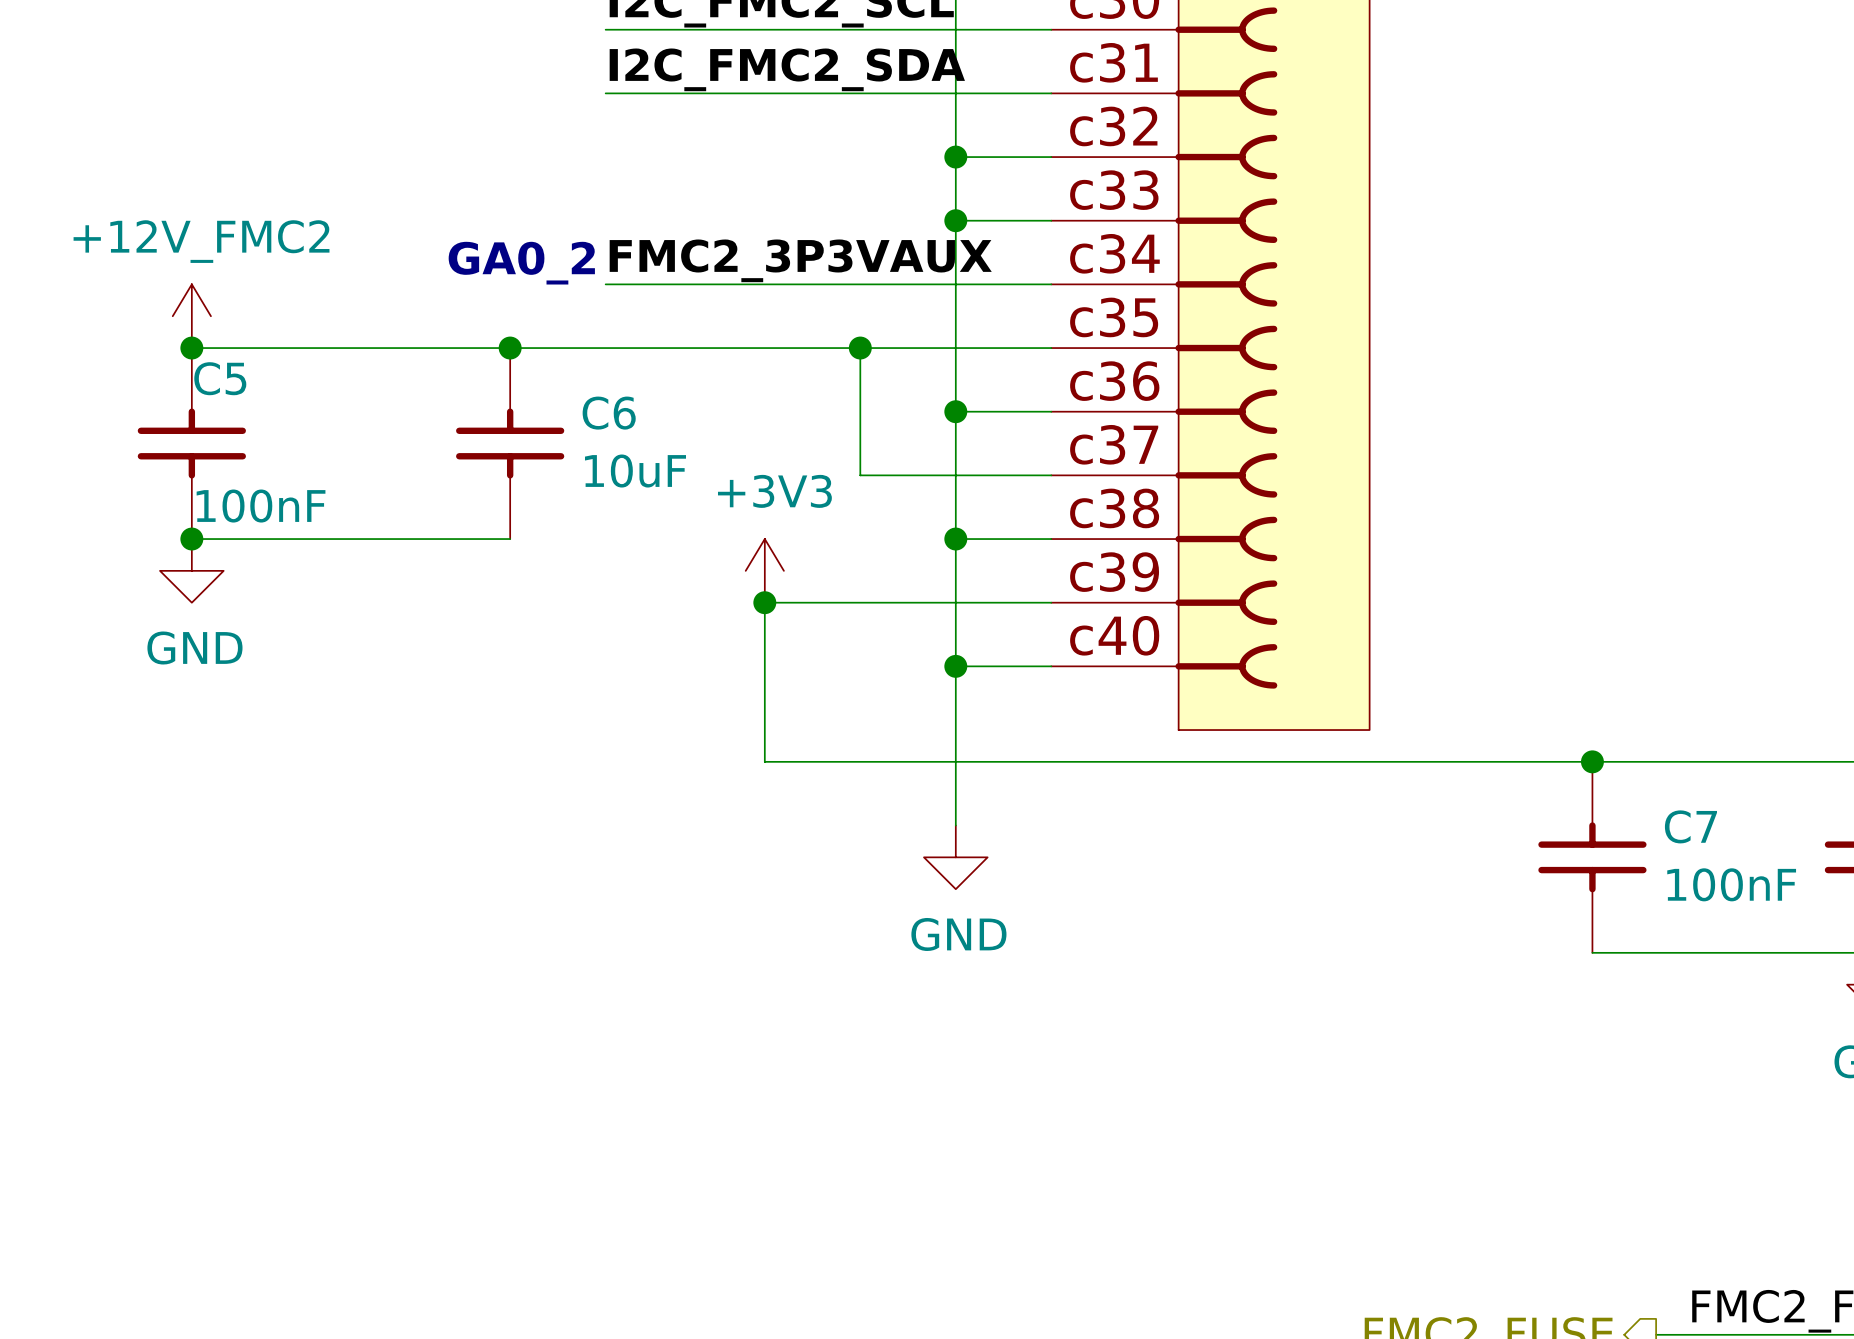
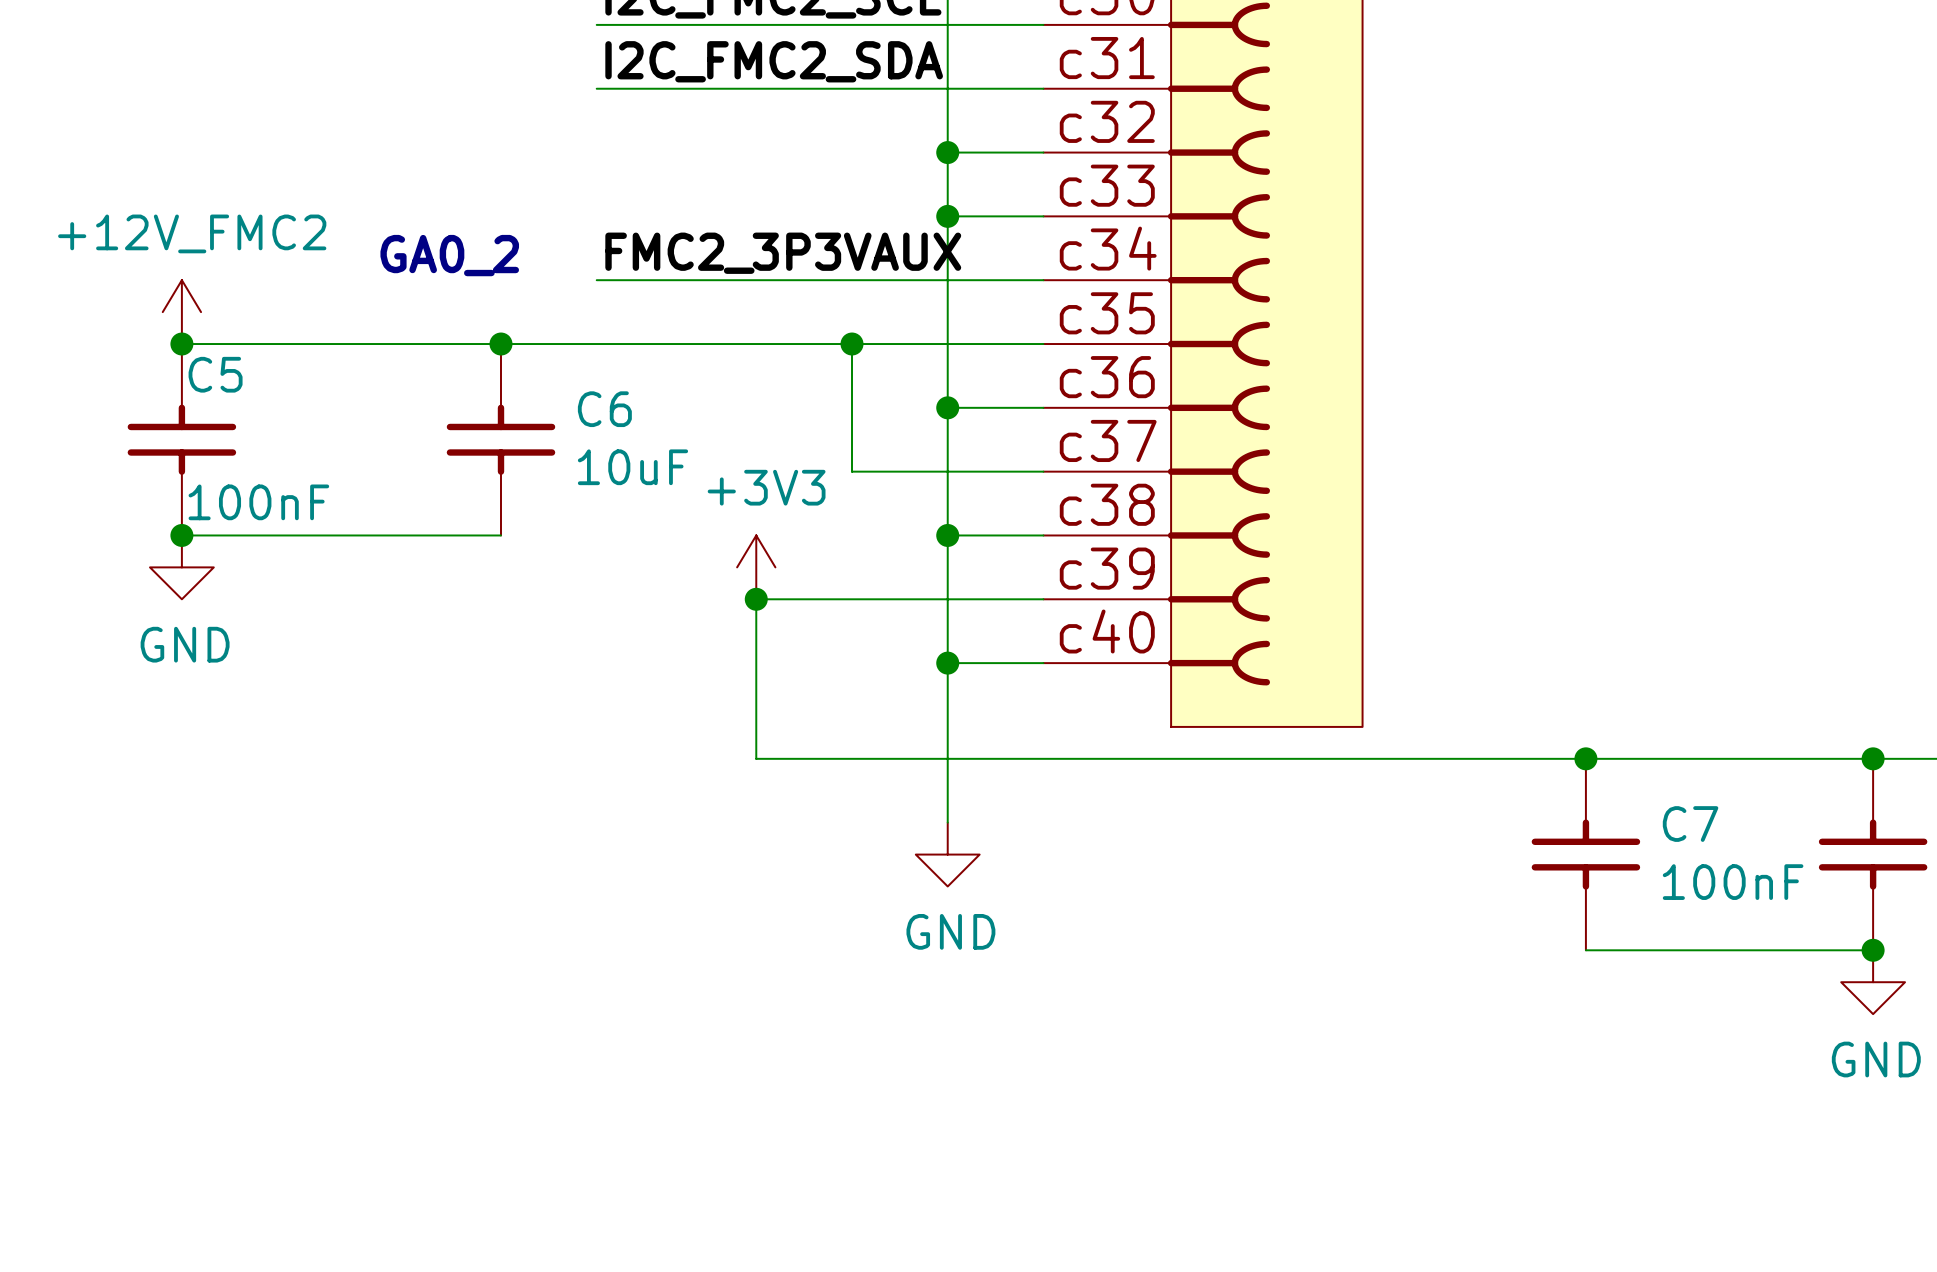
text position: GA0_2 (521, 263) -> GA0_2 (449, 255)

